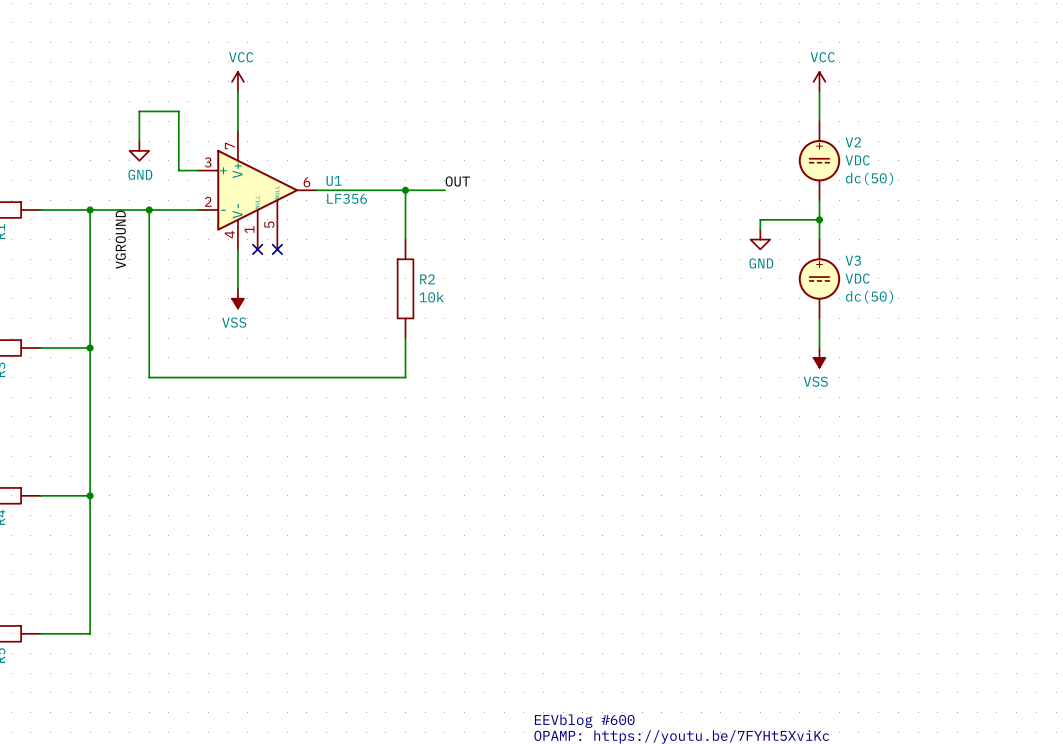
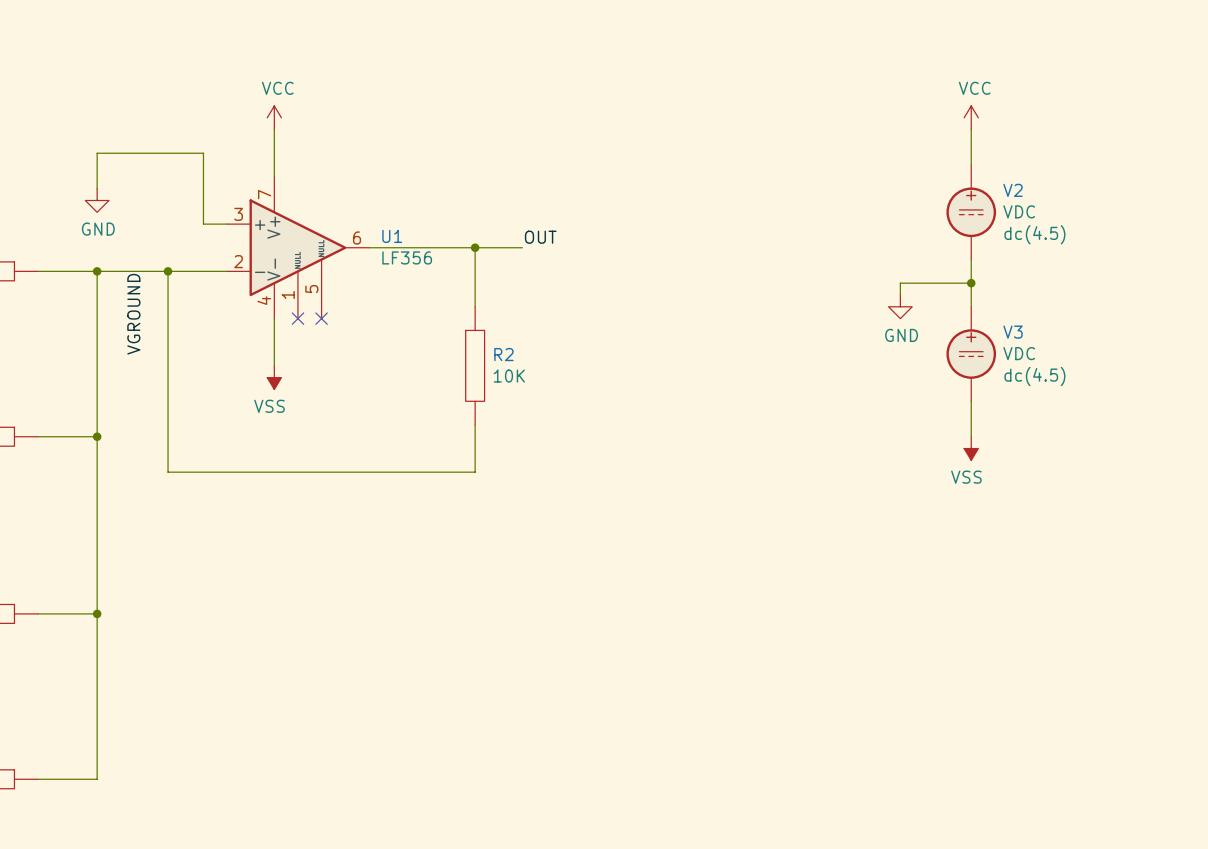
wire: (139, 111) (139, 141) -> (156, 153) (97, 153) (97, 188)
power symbol position: GND (139, 150) -> GND (97, 200)
V2 text: dc(50) (869, 178) -> dc(4.5) (1034, 234)
R2 value: 10k (431, 297) -> 10K (509, 376)
V3 text: dc(50) (869, 297) -> dc(4.5) (1034, 376)

